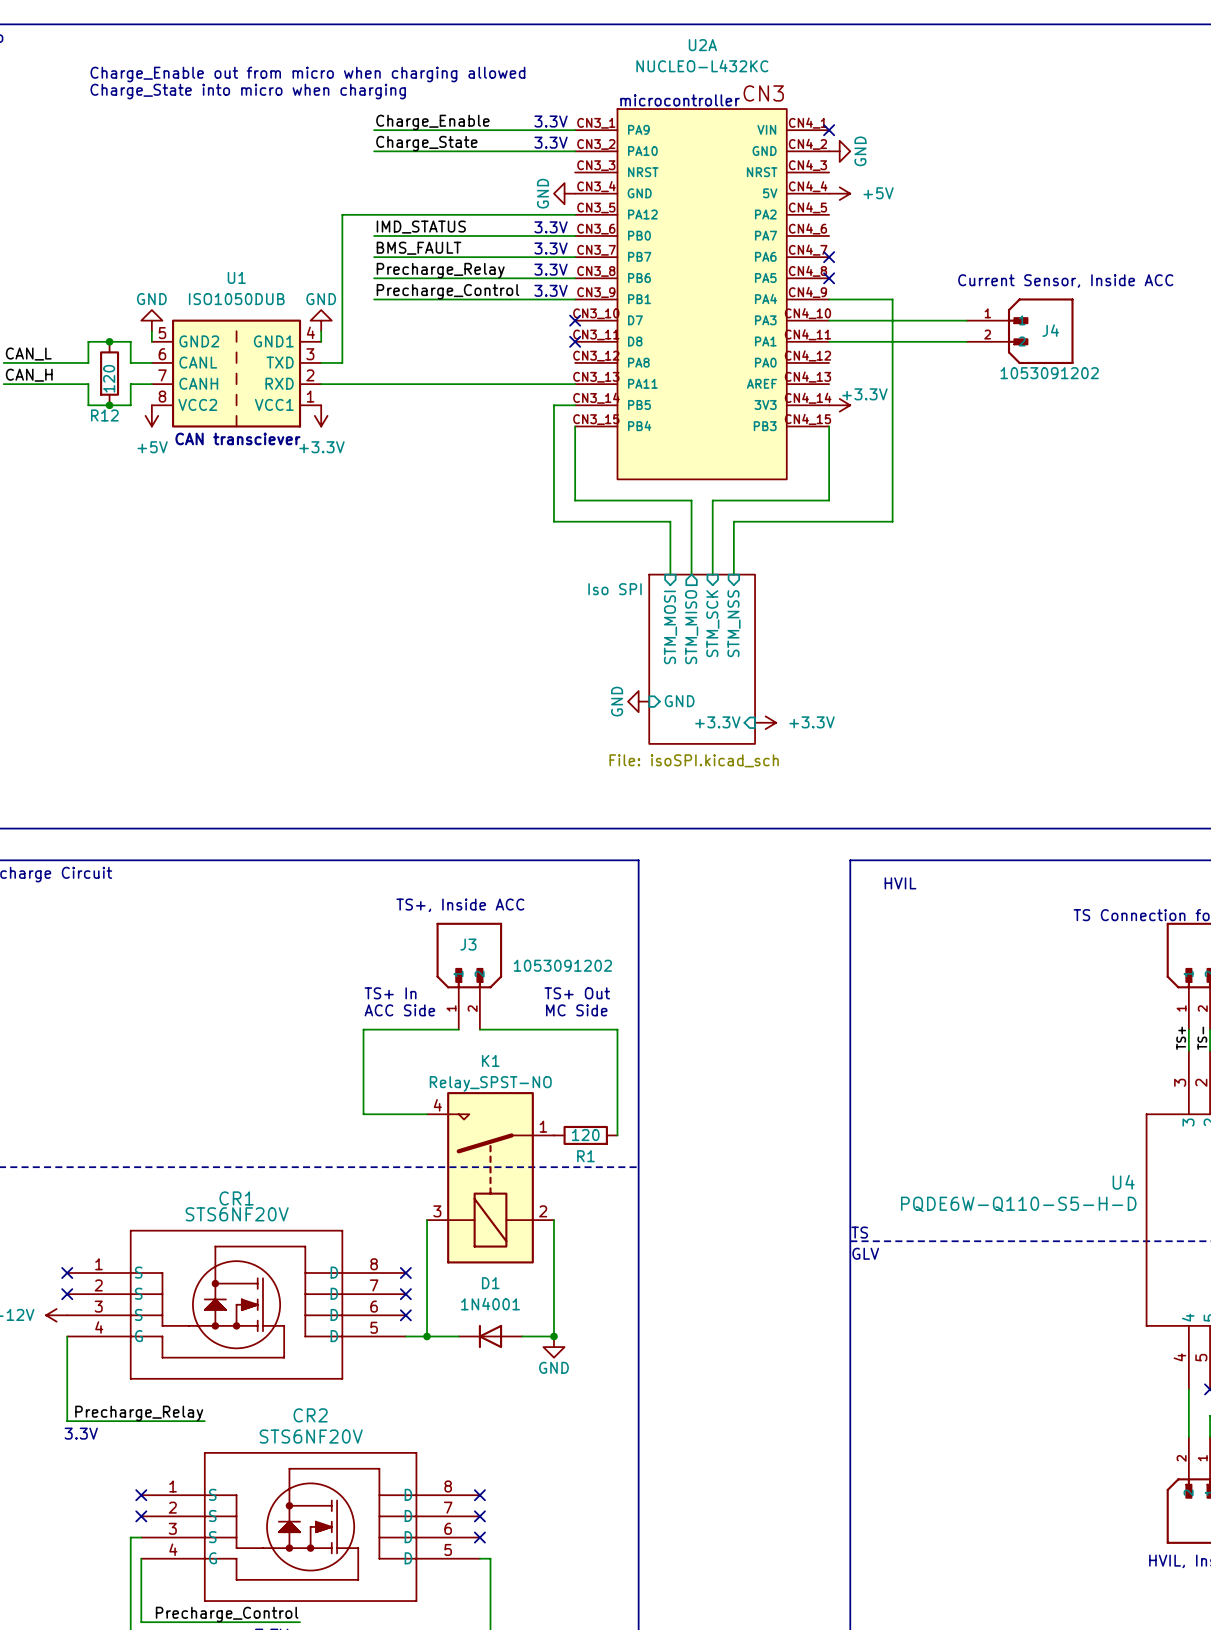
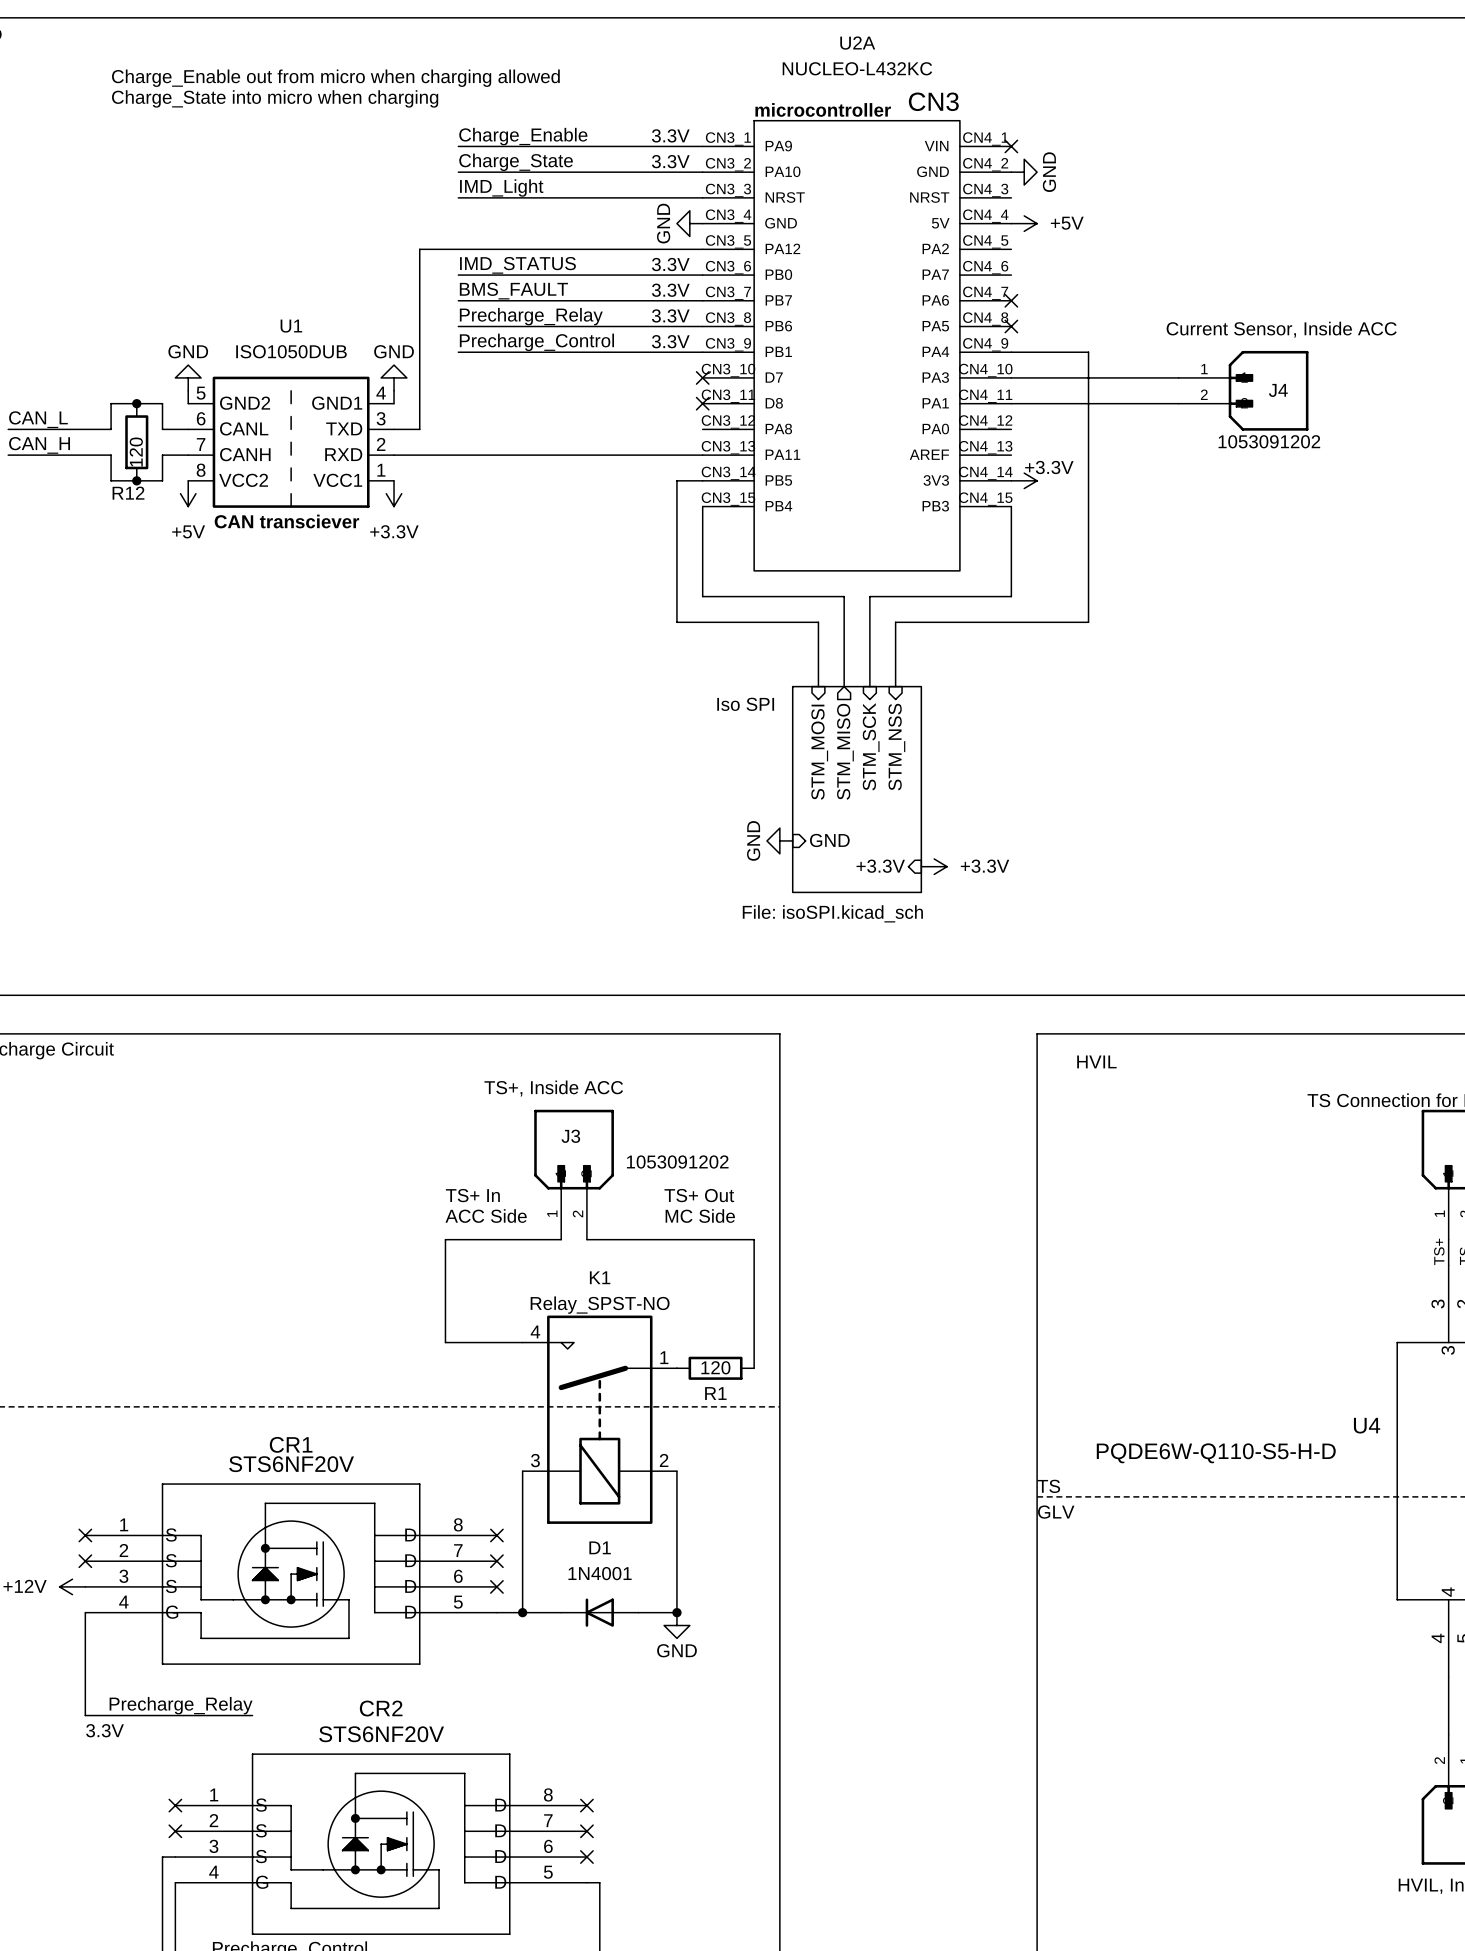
label: none -> IMD_Light (501, 188)
wire: none -> (458, 197) (702, 197)

